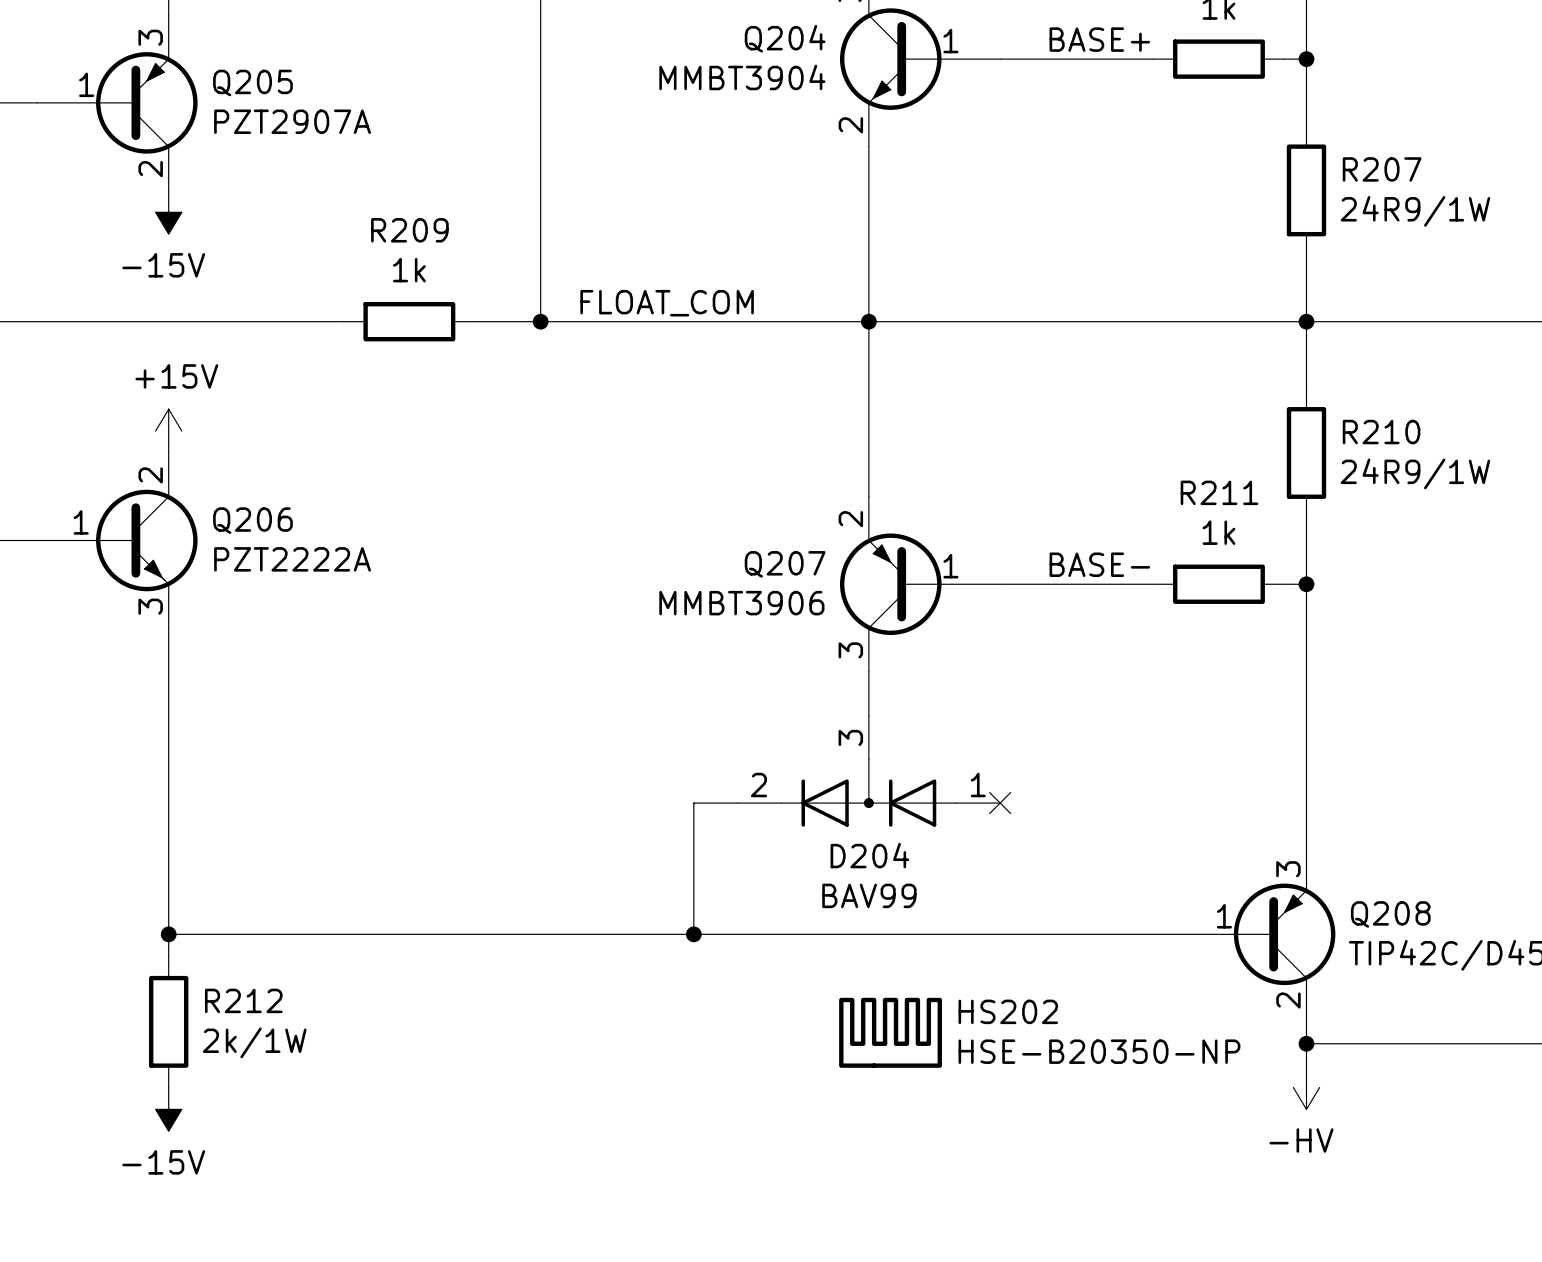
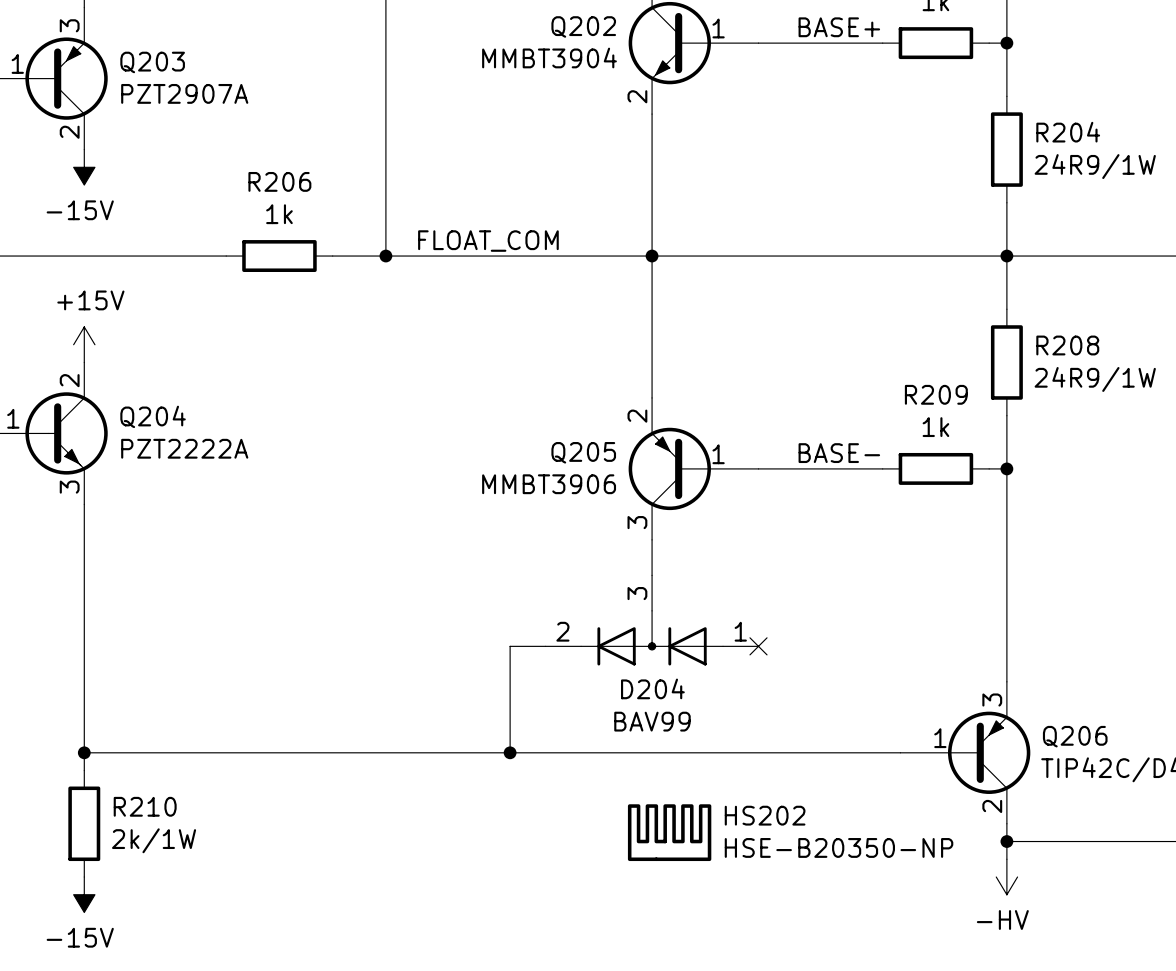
Q204 name: Q204 (785, 38) -> Q202 (583, 26)
Q205 name: Q205 (252, 82) -> Q203 (152, 62)
R207 name: R207 (1382, 169) -> R204 (1068, 132)
R209 name: R209 (409, 230) -> R206 (279, 181)
R210 name: R210 (1381, 432) -> R208 (1067, 345)
R211 name: R211 (1219, 492) -> R209 (936, 394)
Q206 name: Q206 (252, 520) -> Q204 (153, 416)
Q207 name: Q207 (785, 564) -> Q205 (583, 452)
Q208 name: Q208 (1390, 914) -> Q206 (1075, 736)
R212 name: R212 (243, 1000) -> R210 (145, 806)

